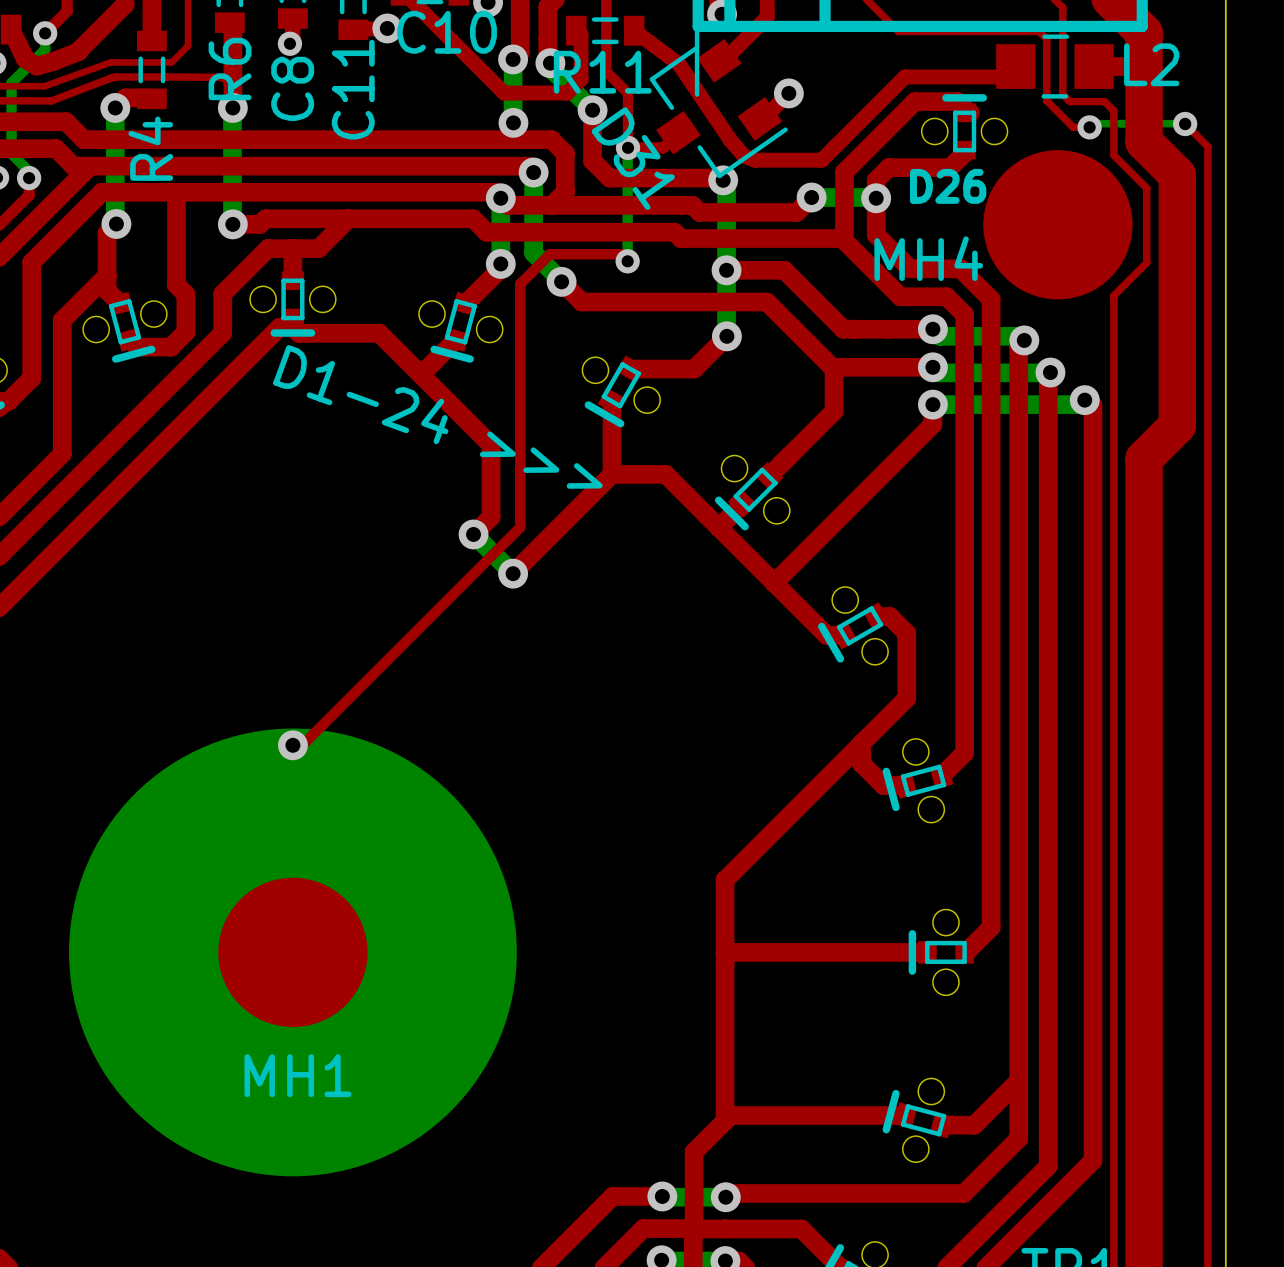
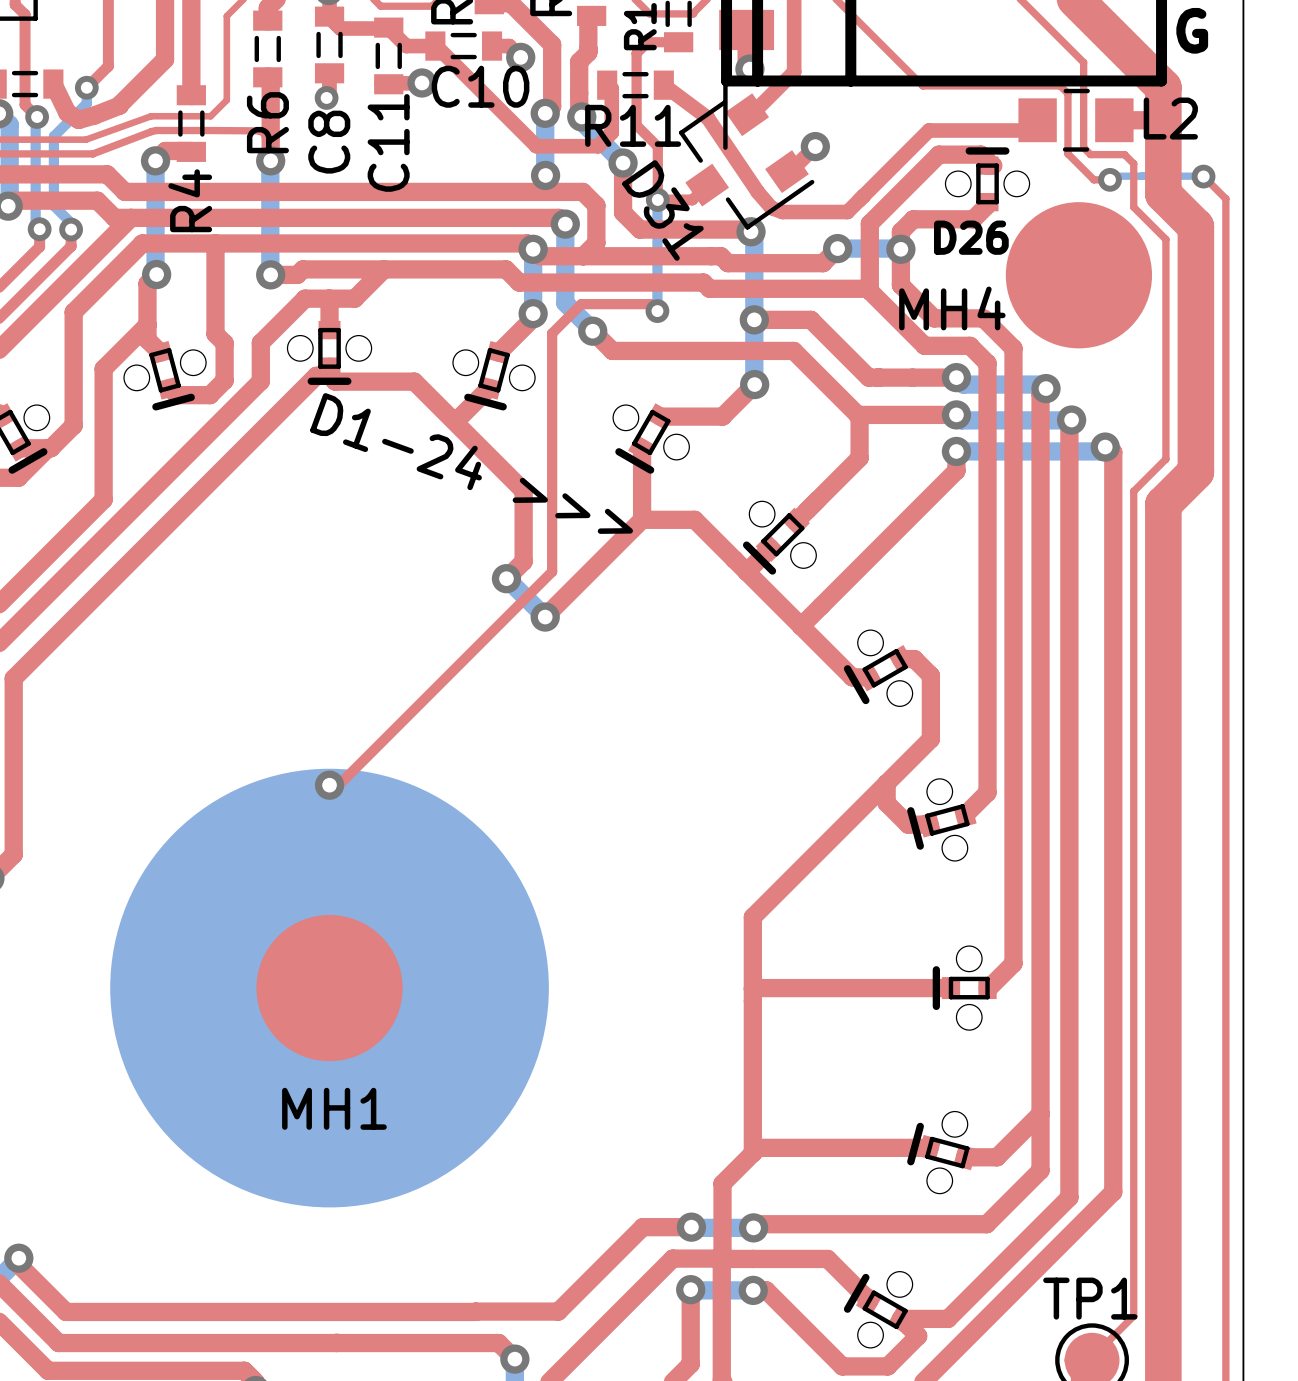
top track: (1146, 262) (1113, 295) (1113, 445) -> (1165, 312) (1165, 459) (1133, 491)

